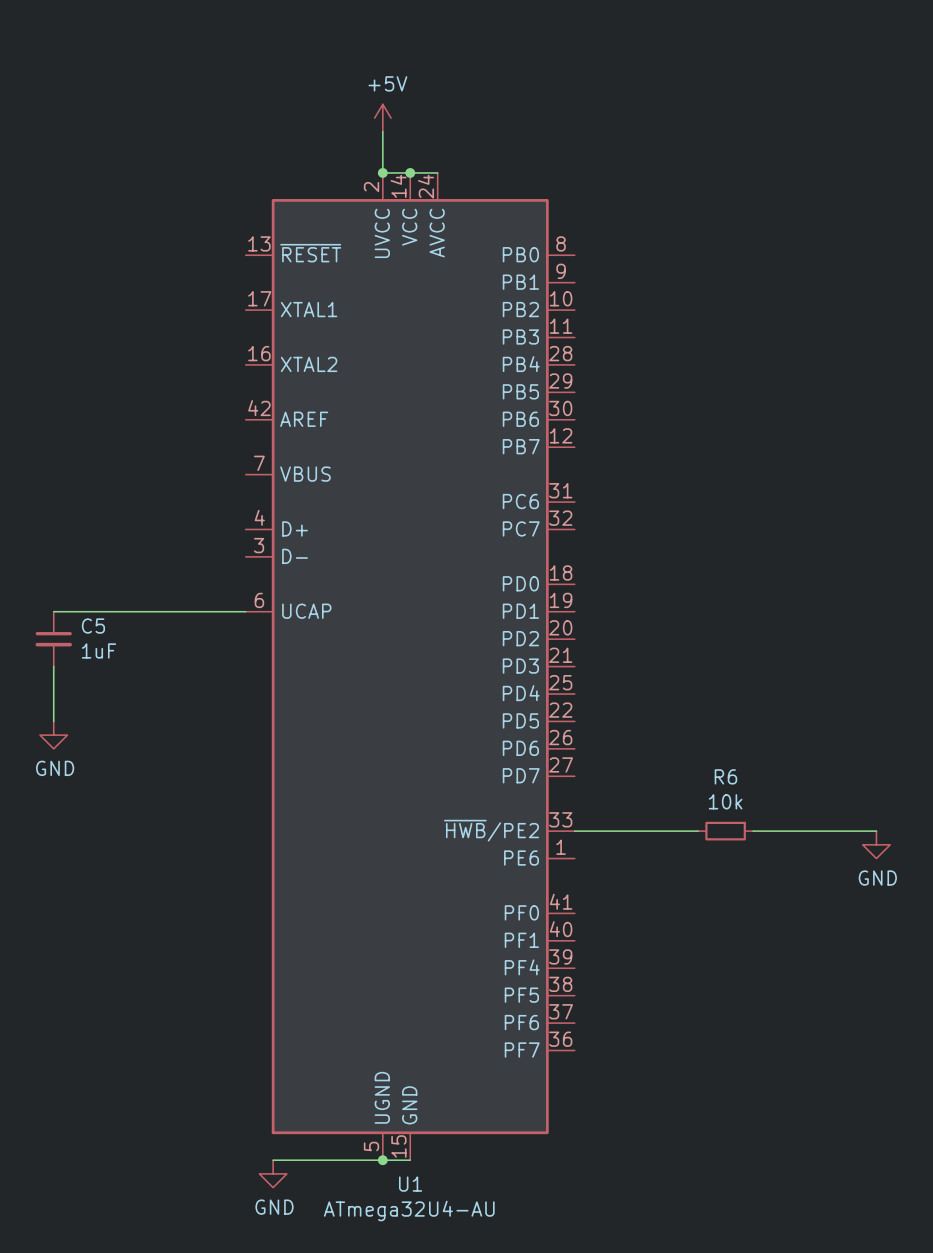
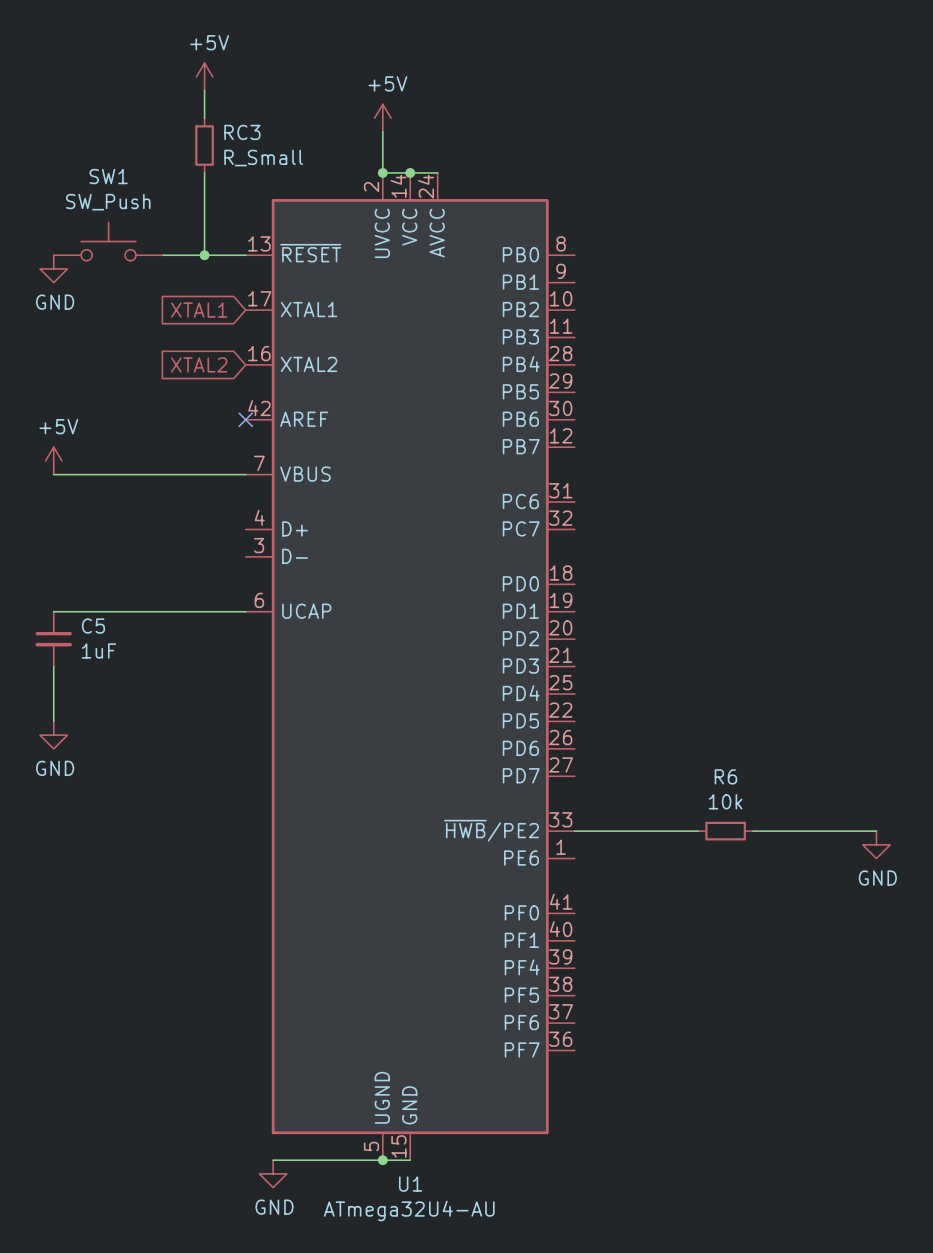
power symbol: none -> +5V (204, 76)
wire: none -> (204, 90) (204, 118)
RC3: none -> R_Small (204, 145)
wire: none -> (204, 172) (204, 255)
SW1: none -> SW_Push (108, 241)
wire: none -> (163, 255) (245, 255)
junction: none -> (204, 255)
power symbol: none -> GND (53, 268)
global label: none -> XTAL1 (199, 310)
global label: none -> XTAL2 (199, 364)
no-connect mark: none -> (245, 419)
power symbol: none -> +5V (53, 460)
wire: none -> (53, 474) (245, 474)

